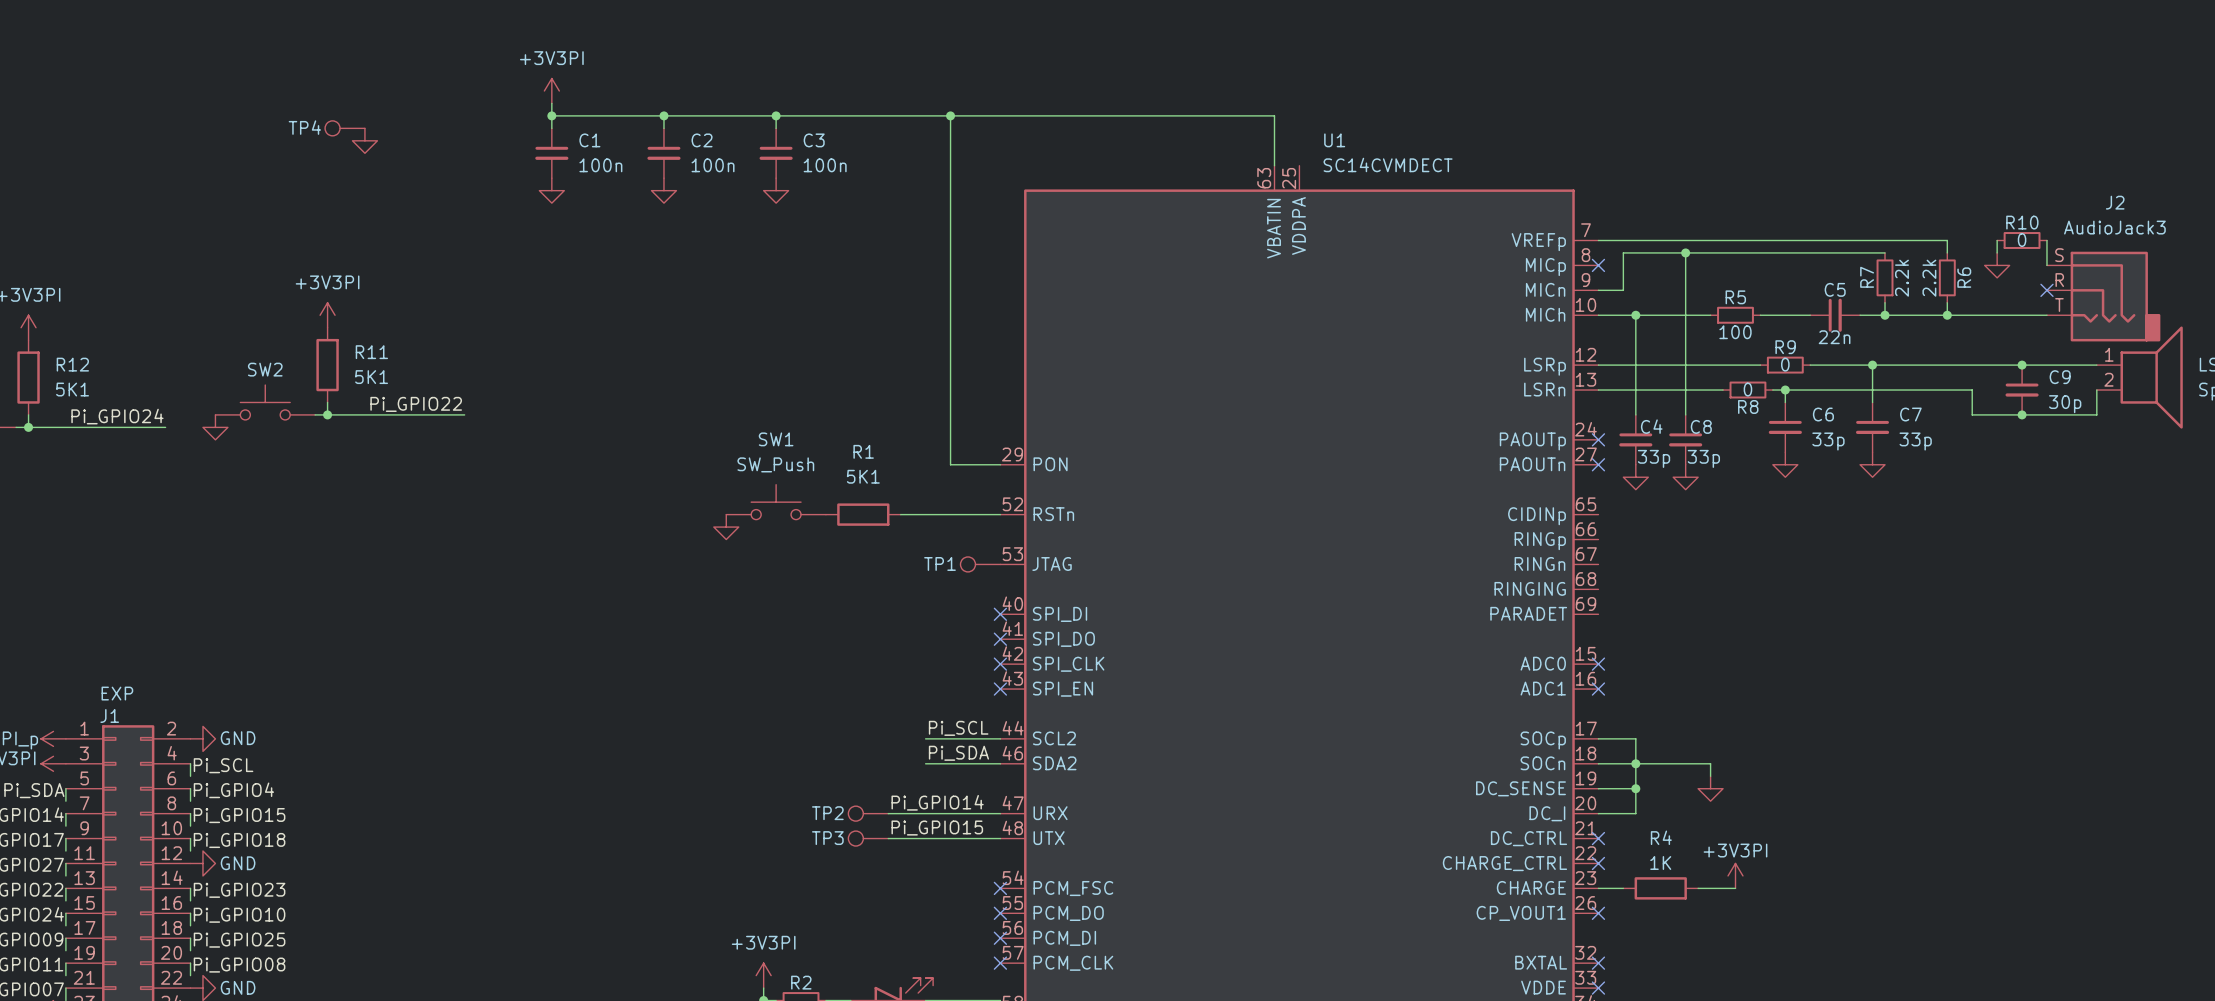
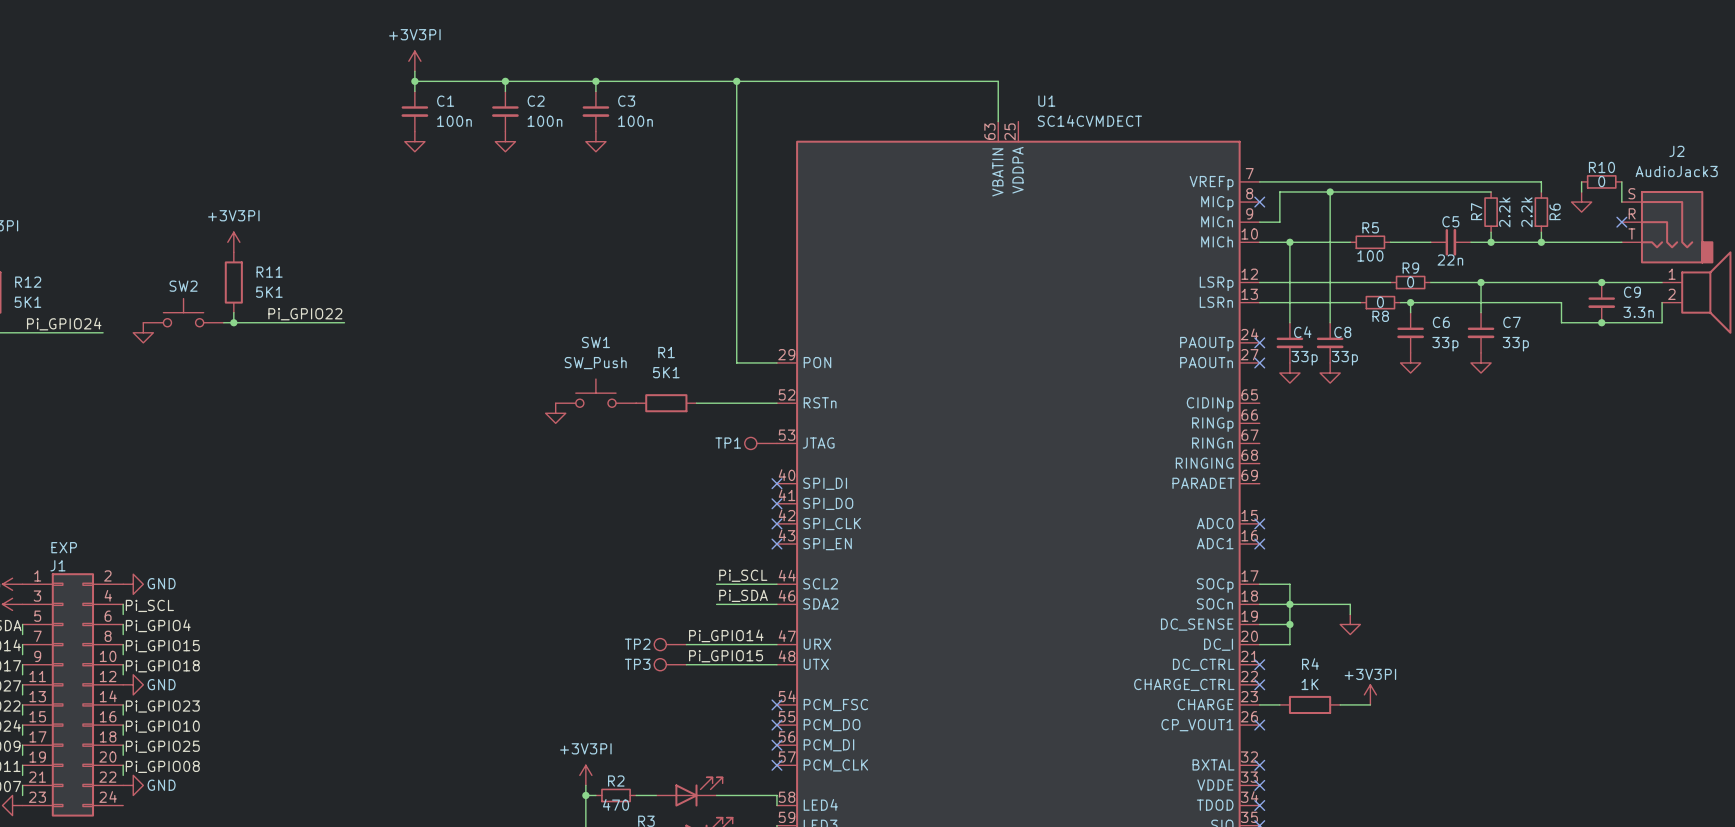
TP4: (345, 128) -> none
power symbol: (364, 140) -> none
C9 value: 30p (2065, 404) -> 3.3n (1638, 312)

